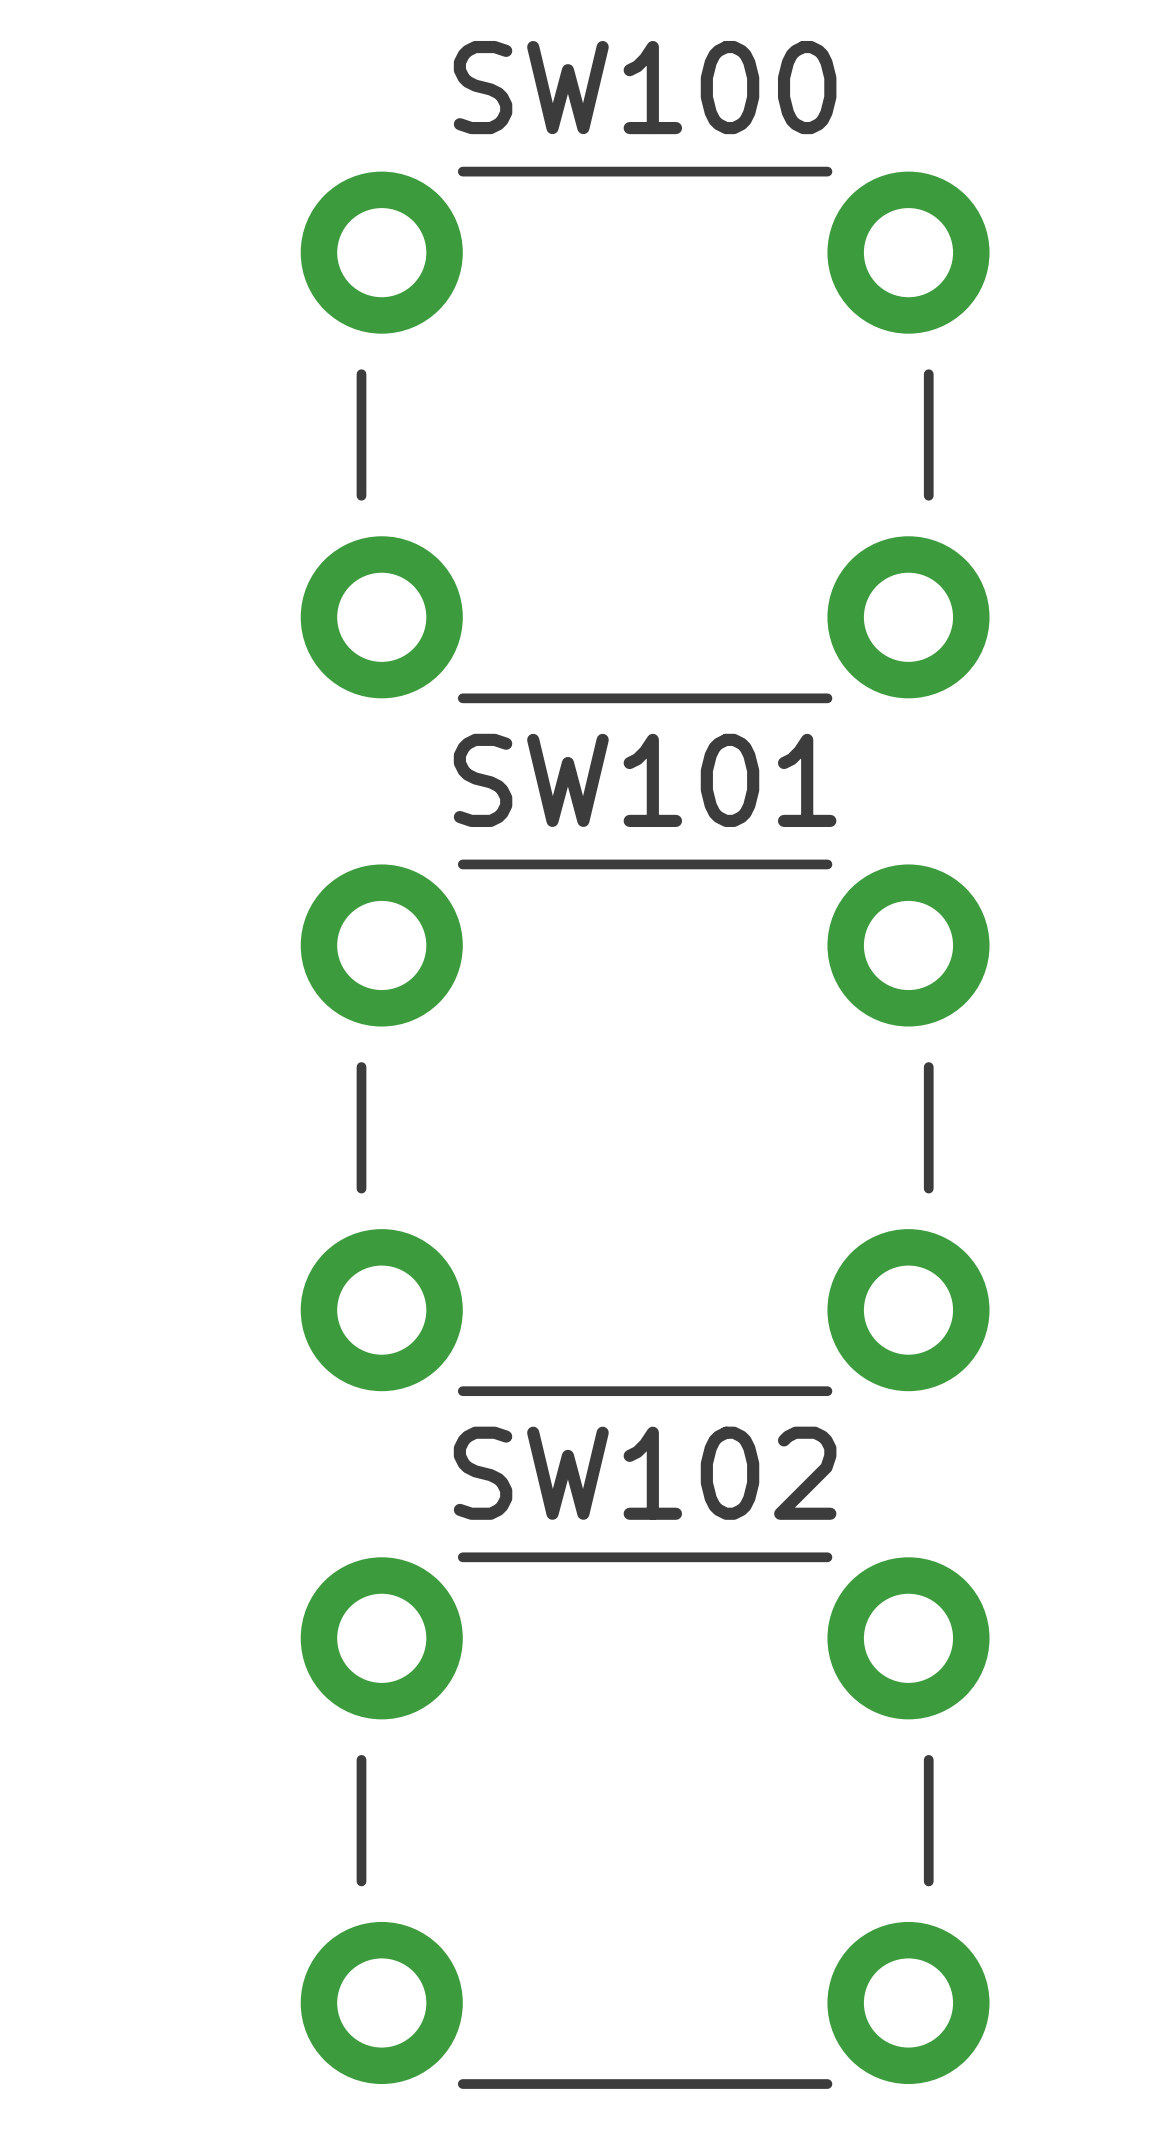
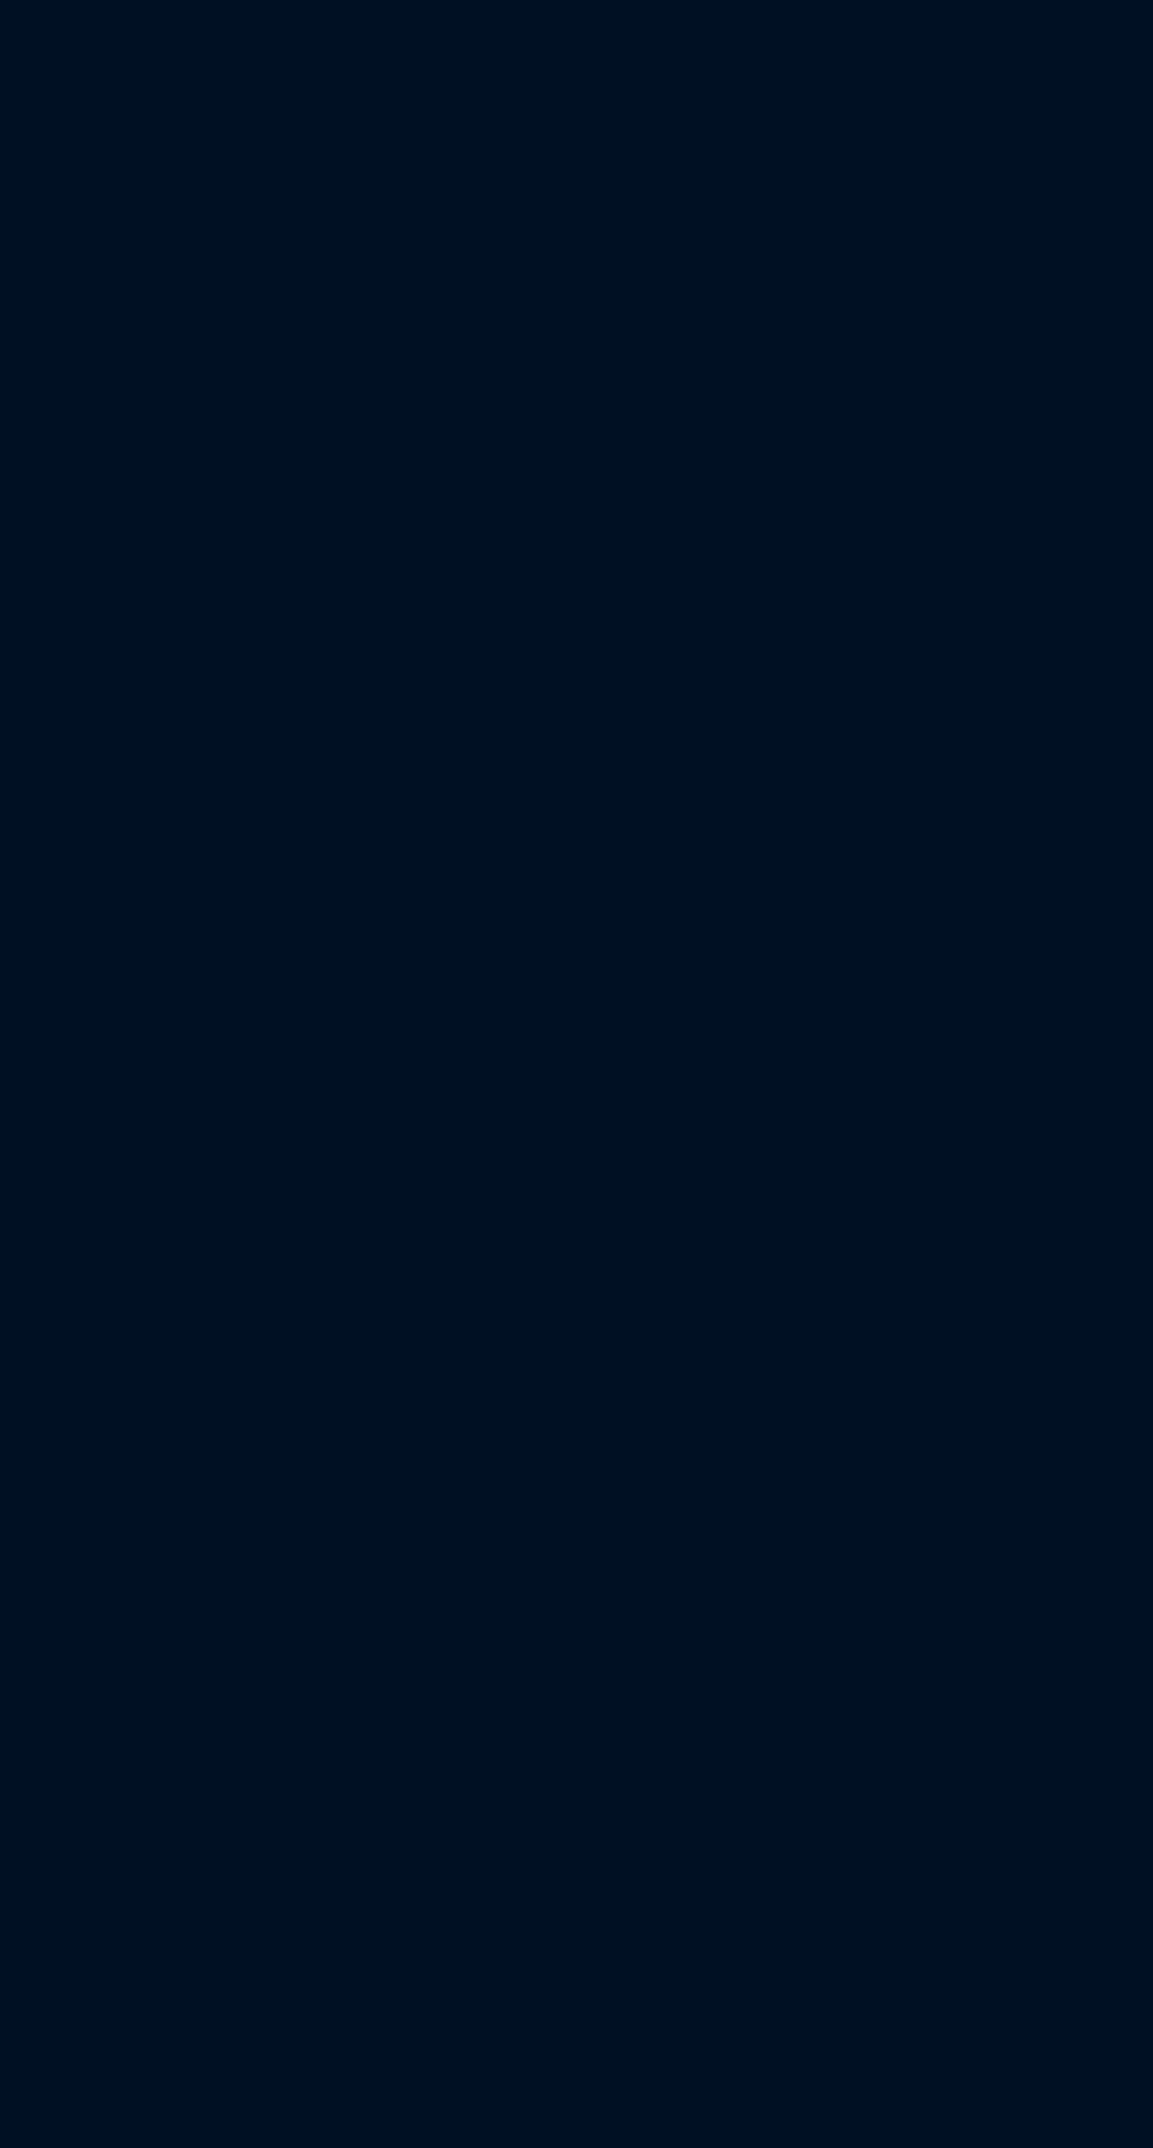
SW100: (645, 434) -> none
SW101: (645, 1127) -> none
SW102: (645, 1820) -> none

